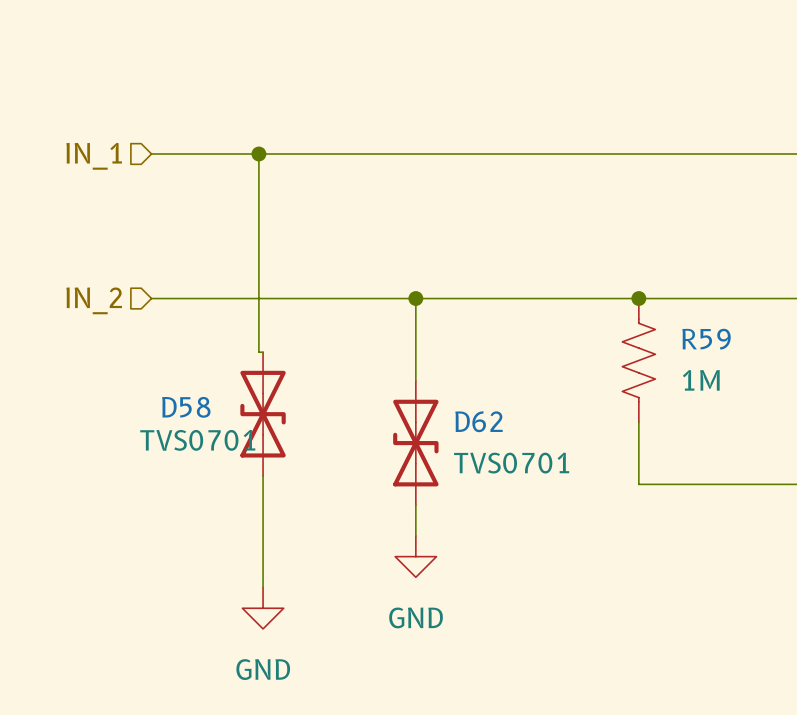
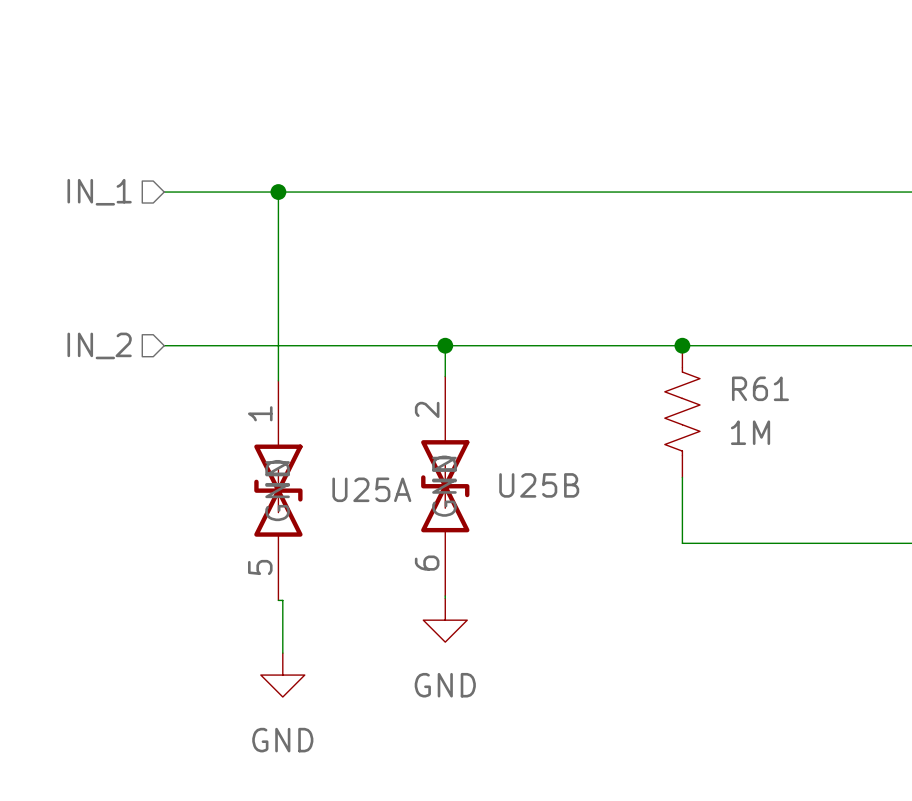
R59 name: R59 (706, 339) -> R61 (760, 388)
D58: TVS0701 (263, 414) -> none
U25B: none -> (445, 486)
U25A: none -> (278, 490)
D62: TVS0701 (415, 443) -> none
wire: (263, 476) (263, 538) -> (278, 600) (282, 600)

